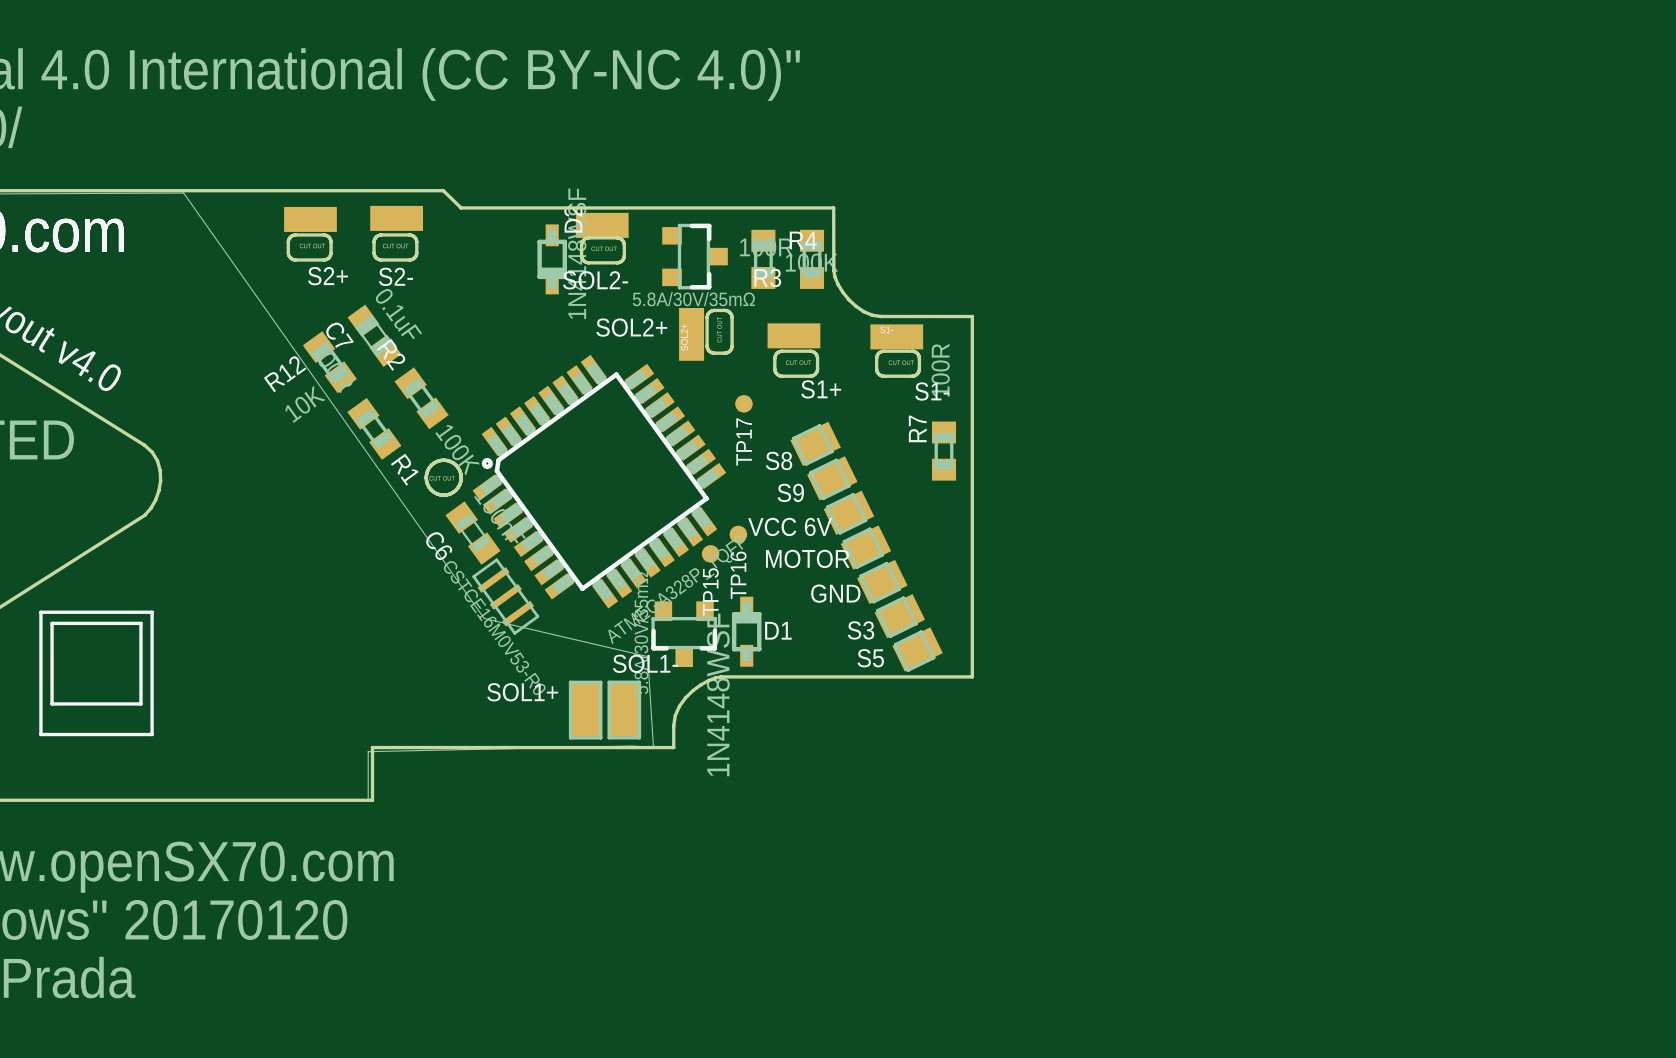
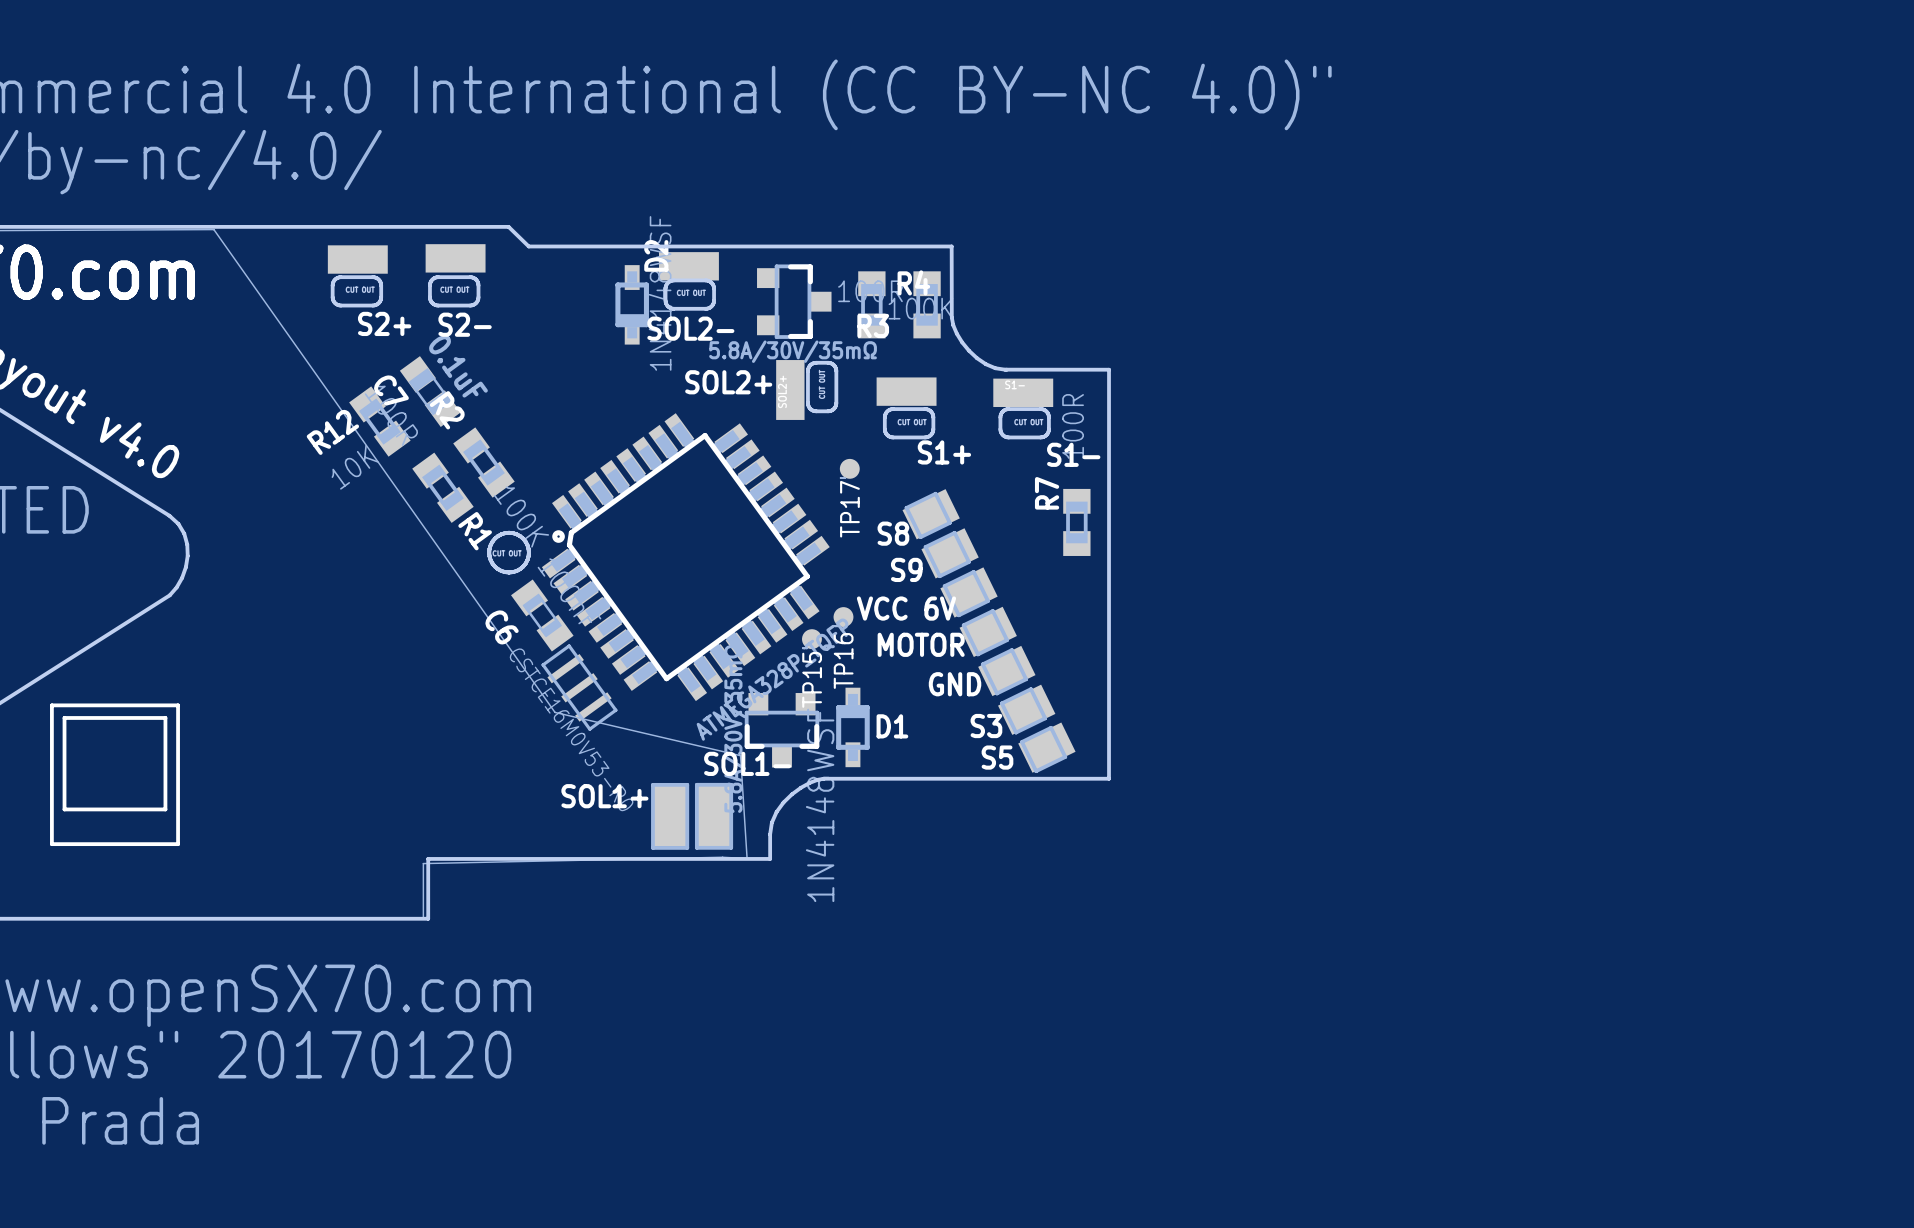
R1 position: (374, 428) -> (442, 487)

